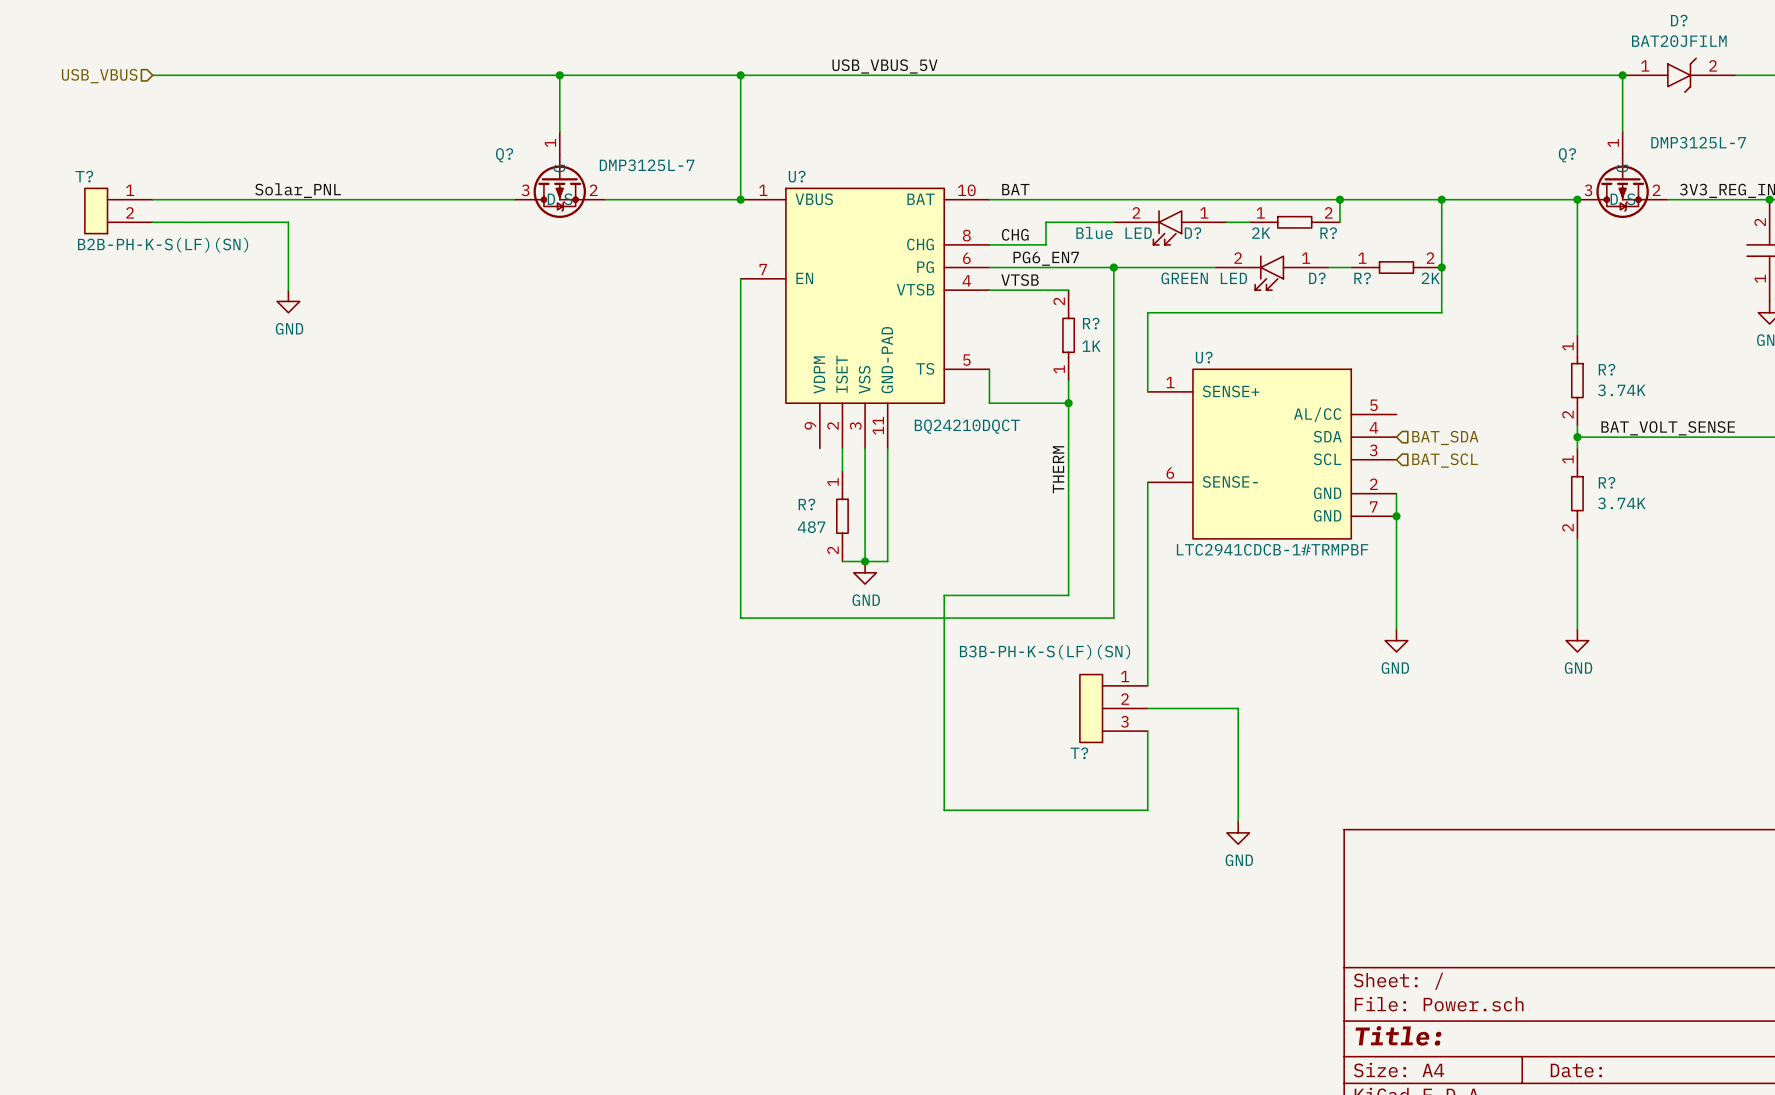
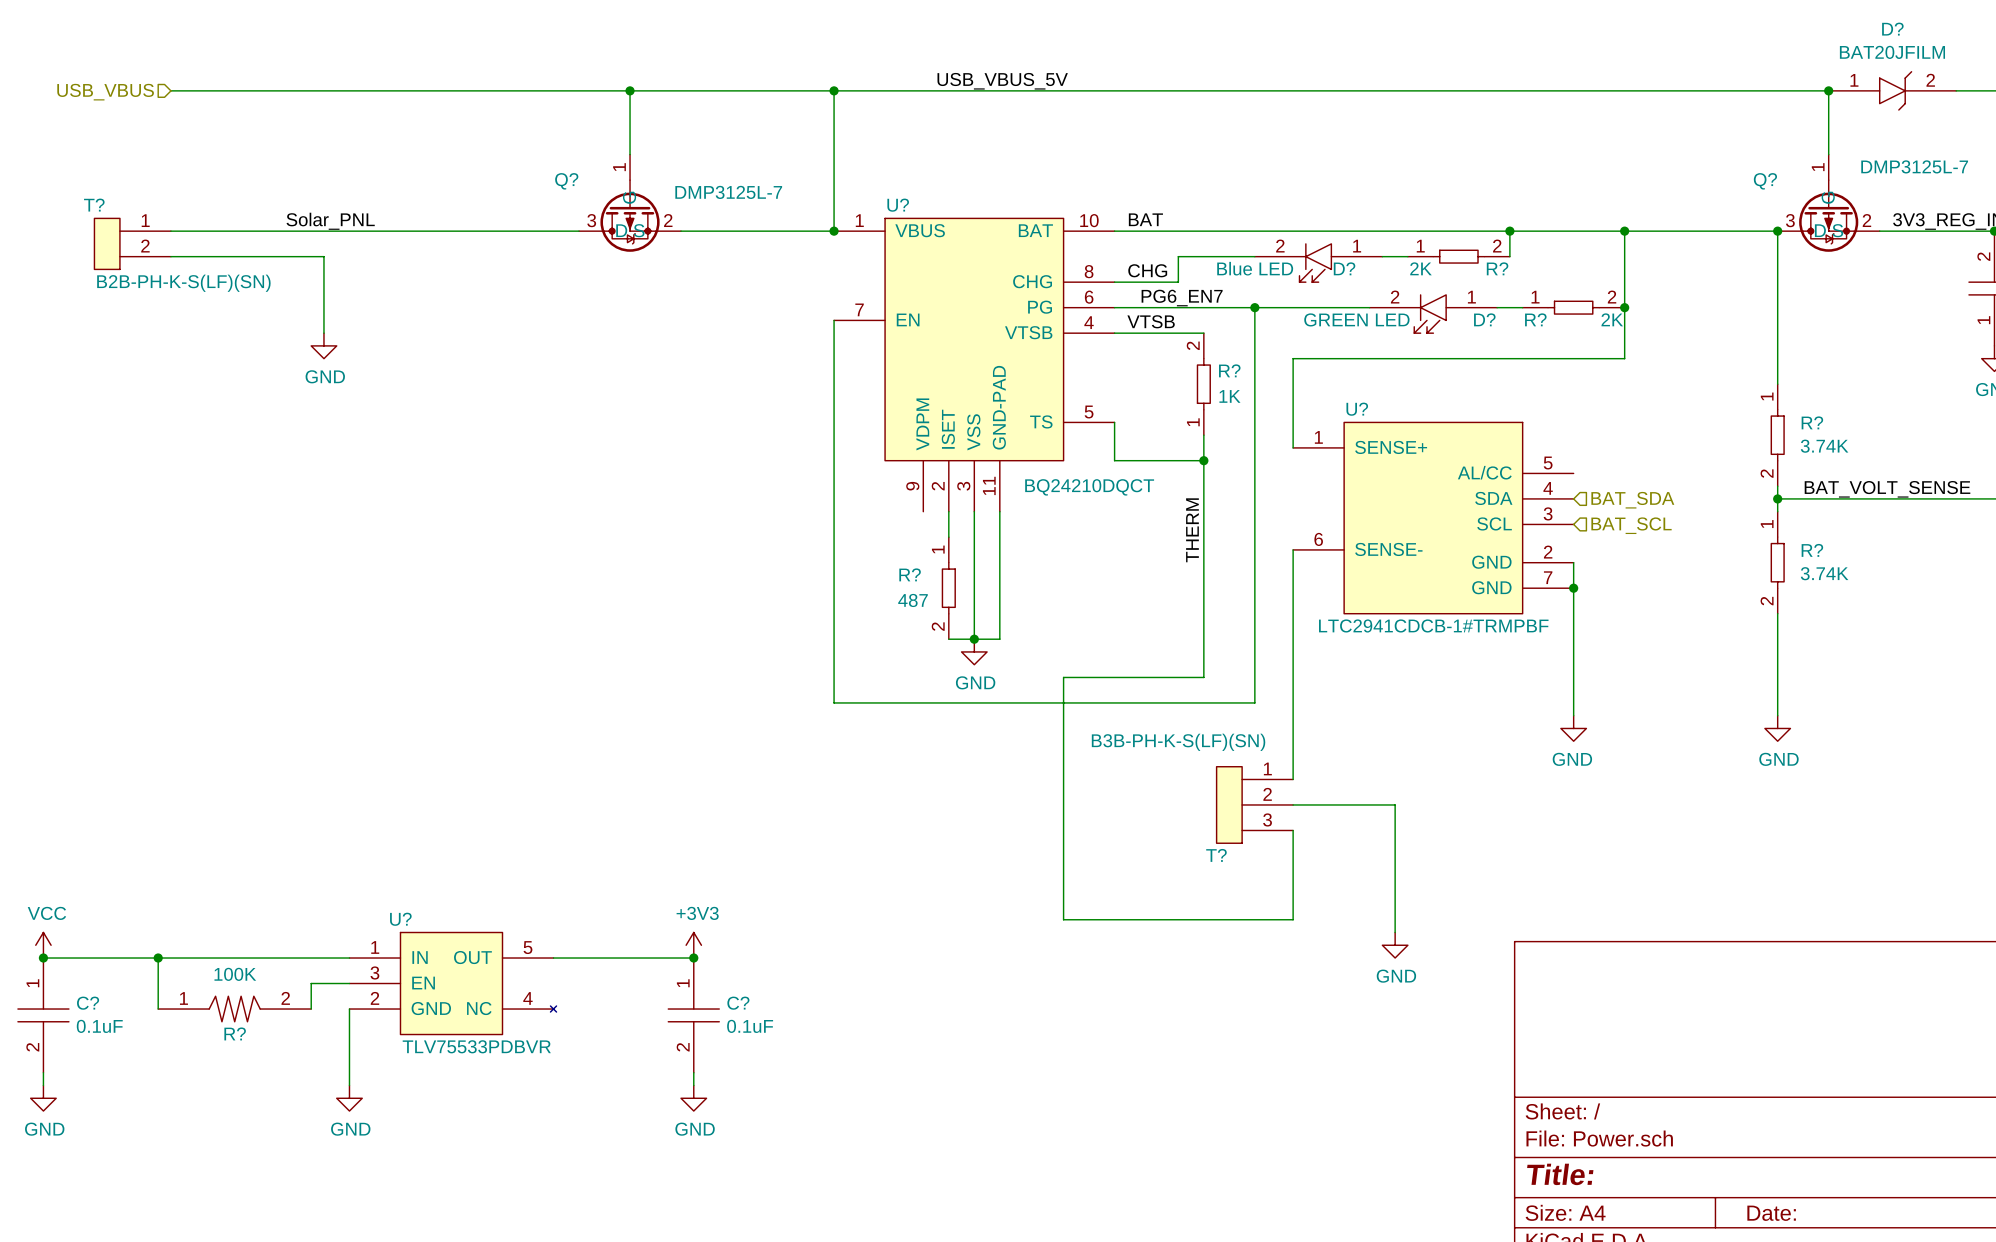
power symbol: none -> VCC (43, 945)
power symbol: none -> +3V3 (693, 945)
wire: none -> (43, 958) (349, 958)
junction: none -> (43, 958)
wire: none -> (158, 958) (158, 1009)
junction: none -> (158, 958)
wire: none -> (553, 958) (693, 958)
junction: none -> (693, 958)
wire: none -> (349, 983) (311, 983) (311, 1009)
U?: none -> (453, 983)
R?: none -> (234, 1009)
wire: none -> (349, 1009) (349, 1085)
C?: none -> (43, 1015)
C?: none -> (693, 1015)
wire: none -> (43, 1072) (43, 1085)
wire: none -> (693, 1072) (693, 1085)
power symbol: none -> GND (43, 1098)
power symbol: none -> GND (349, 1098)
power symbol: none -> GND (693, 1098)

